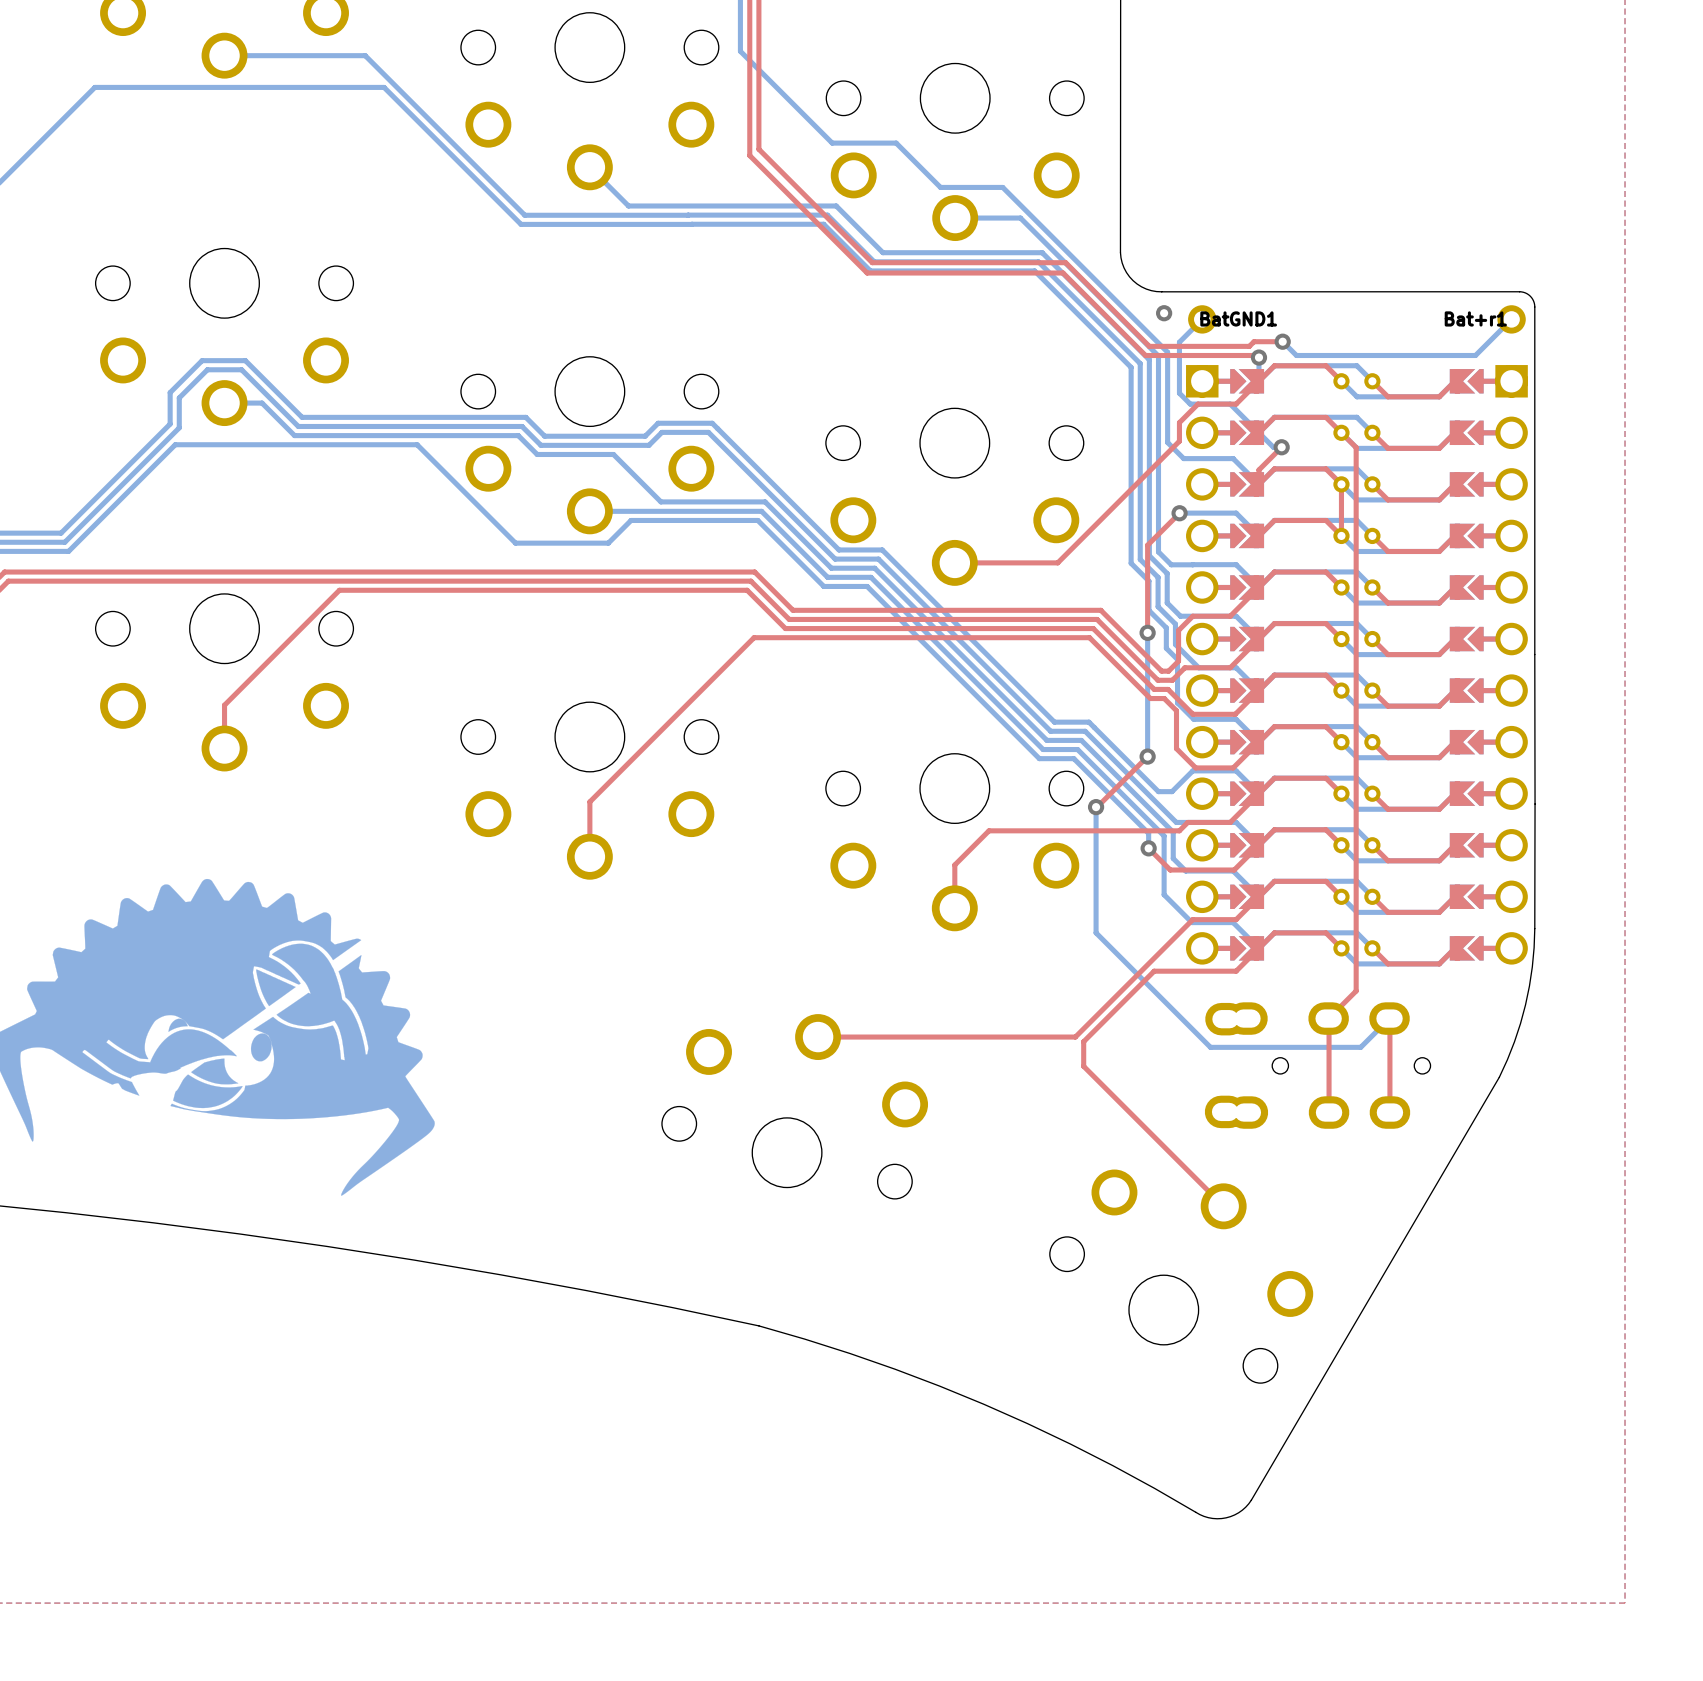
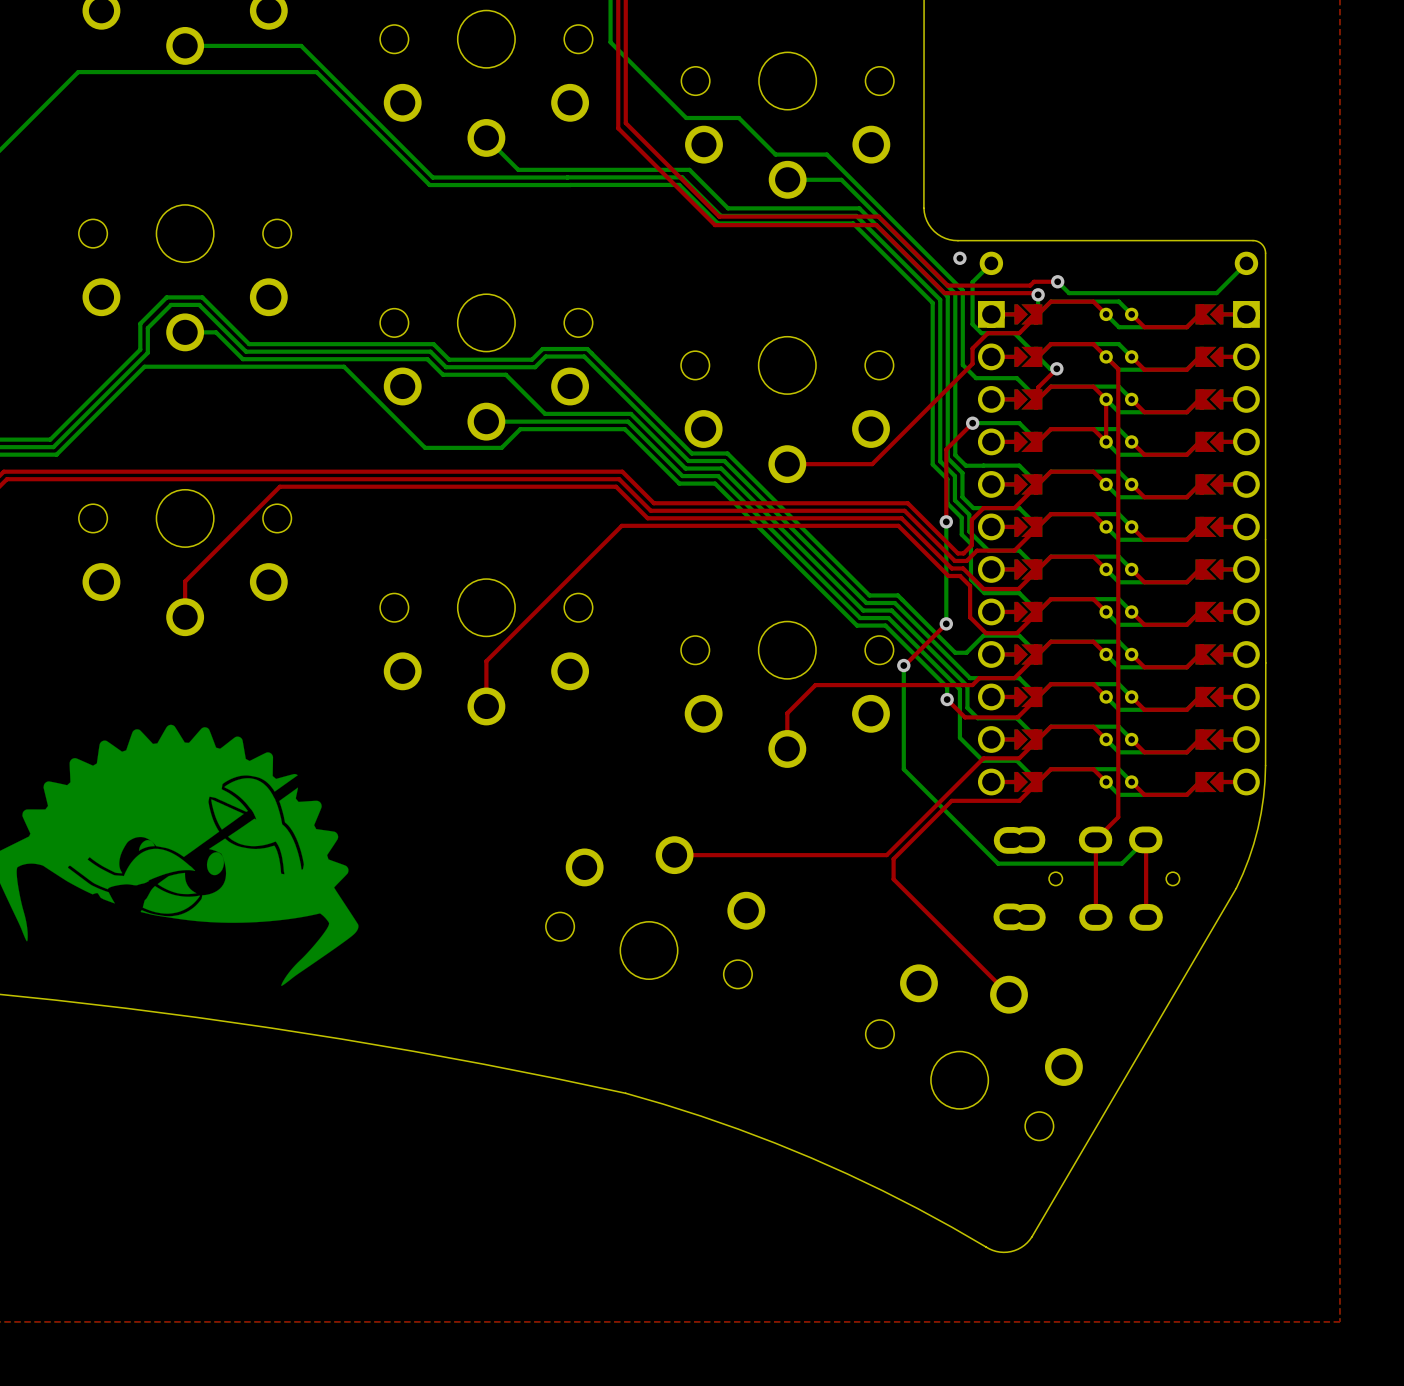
BatGND1 name: BatGND1 (1238, 318) -> none
Bat+r1 name: Bat+r1 (1475, 318) -> none

